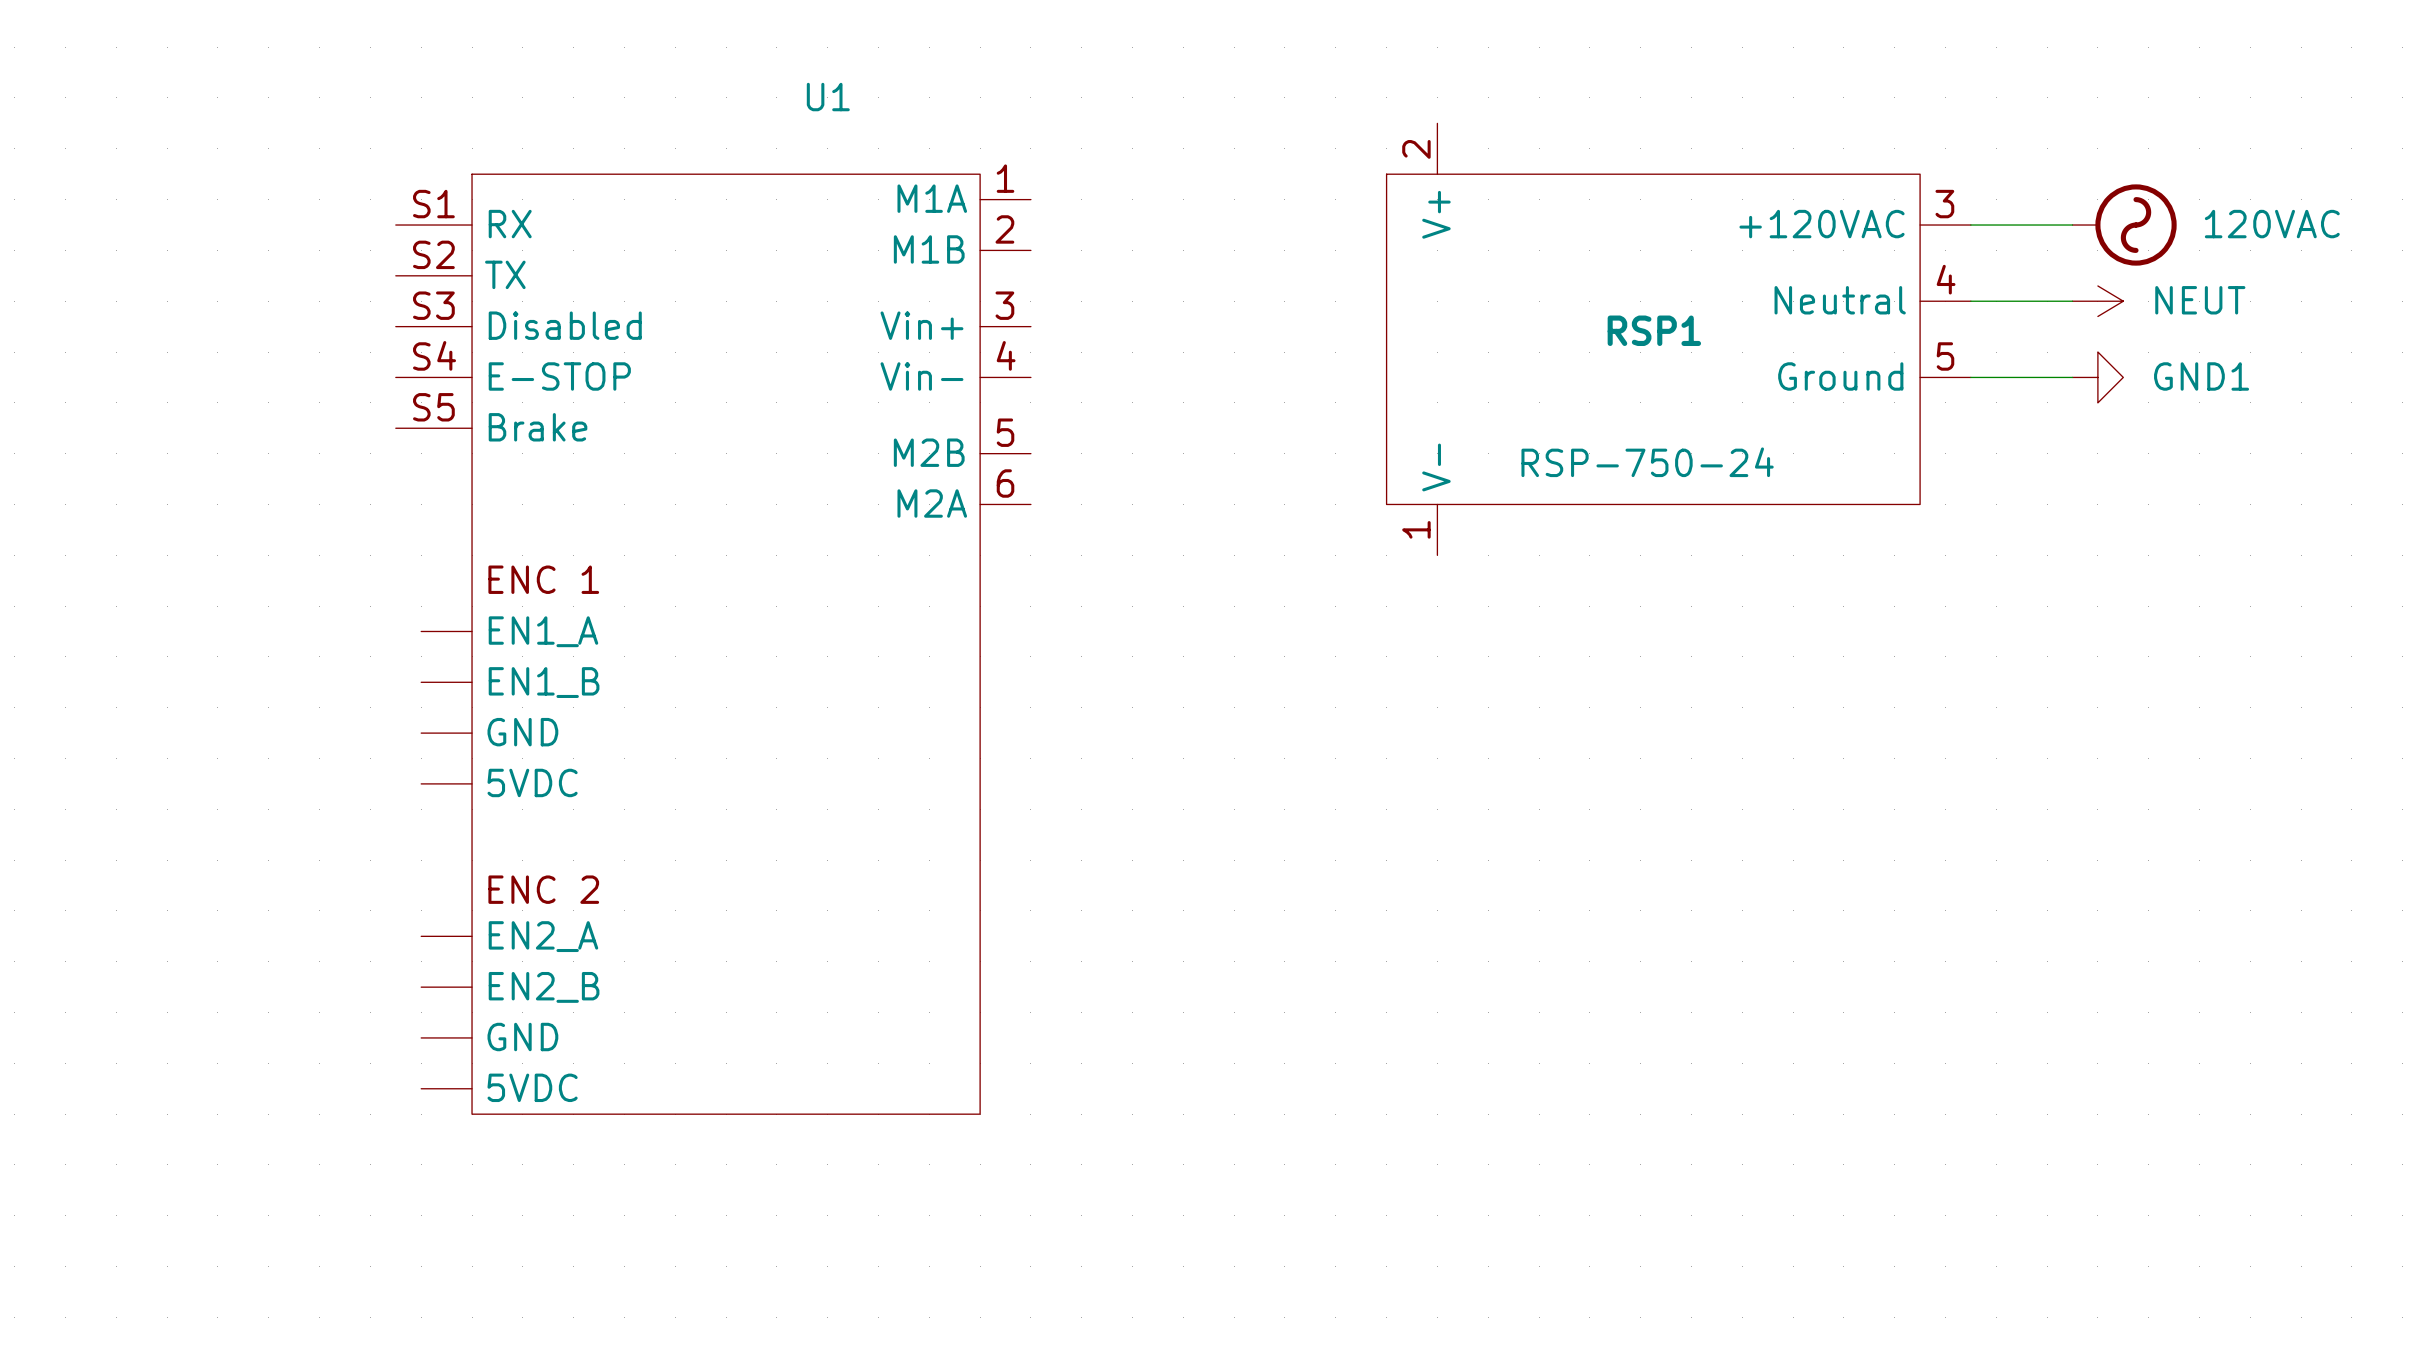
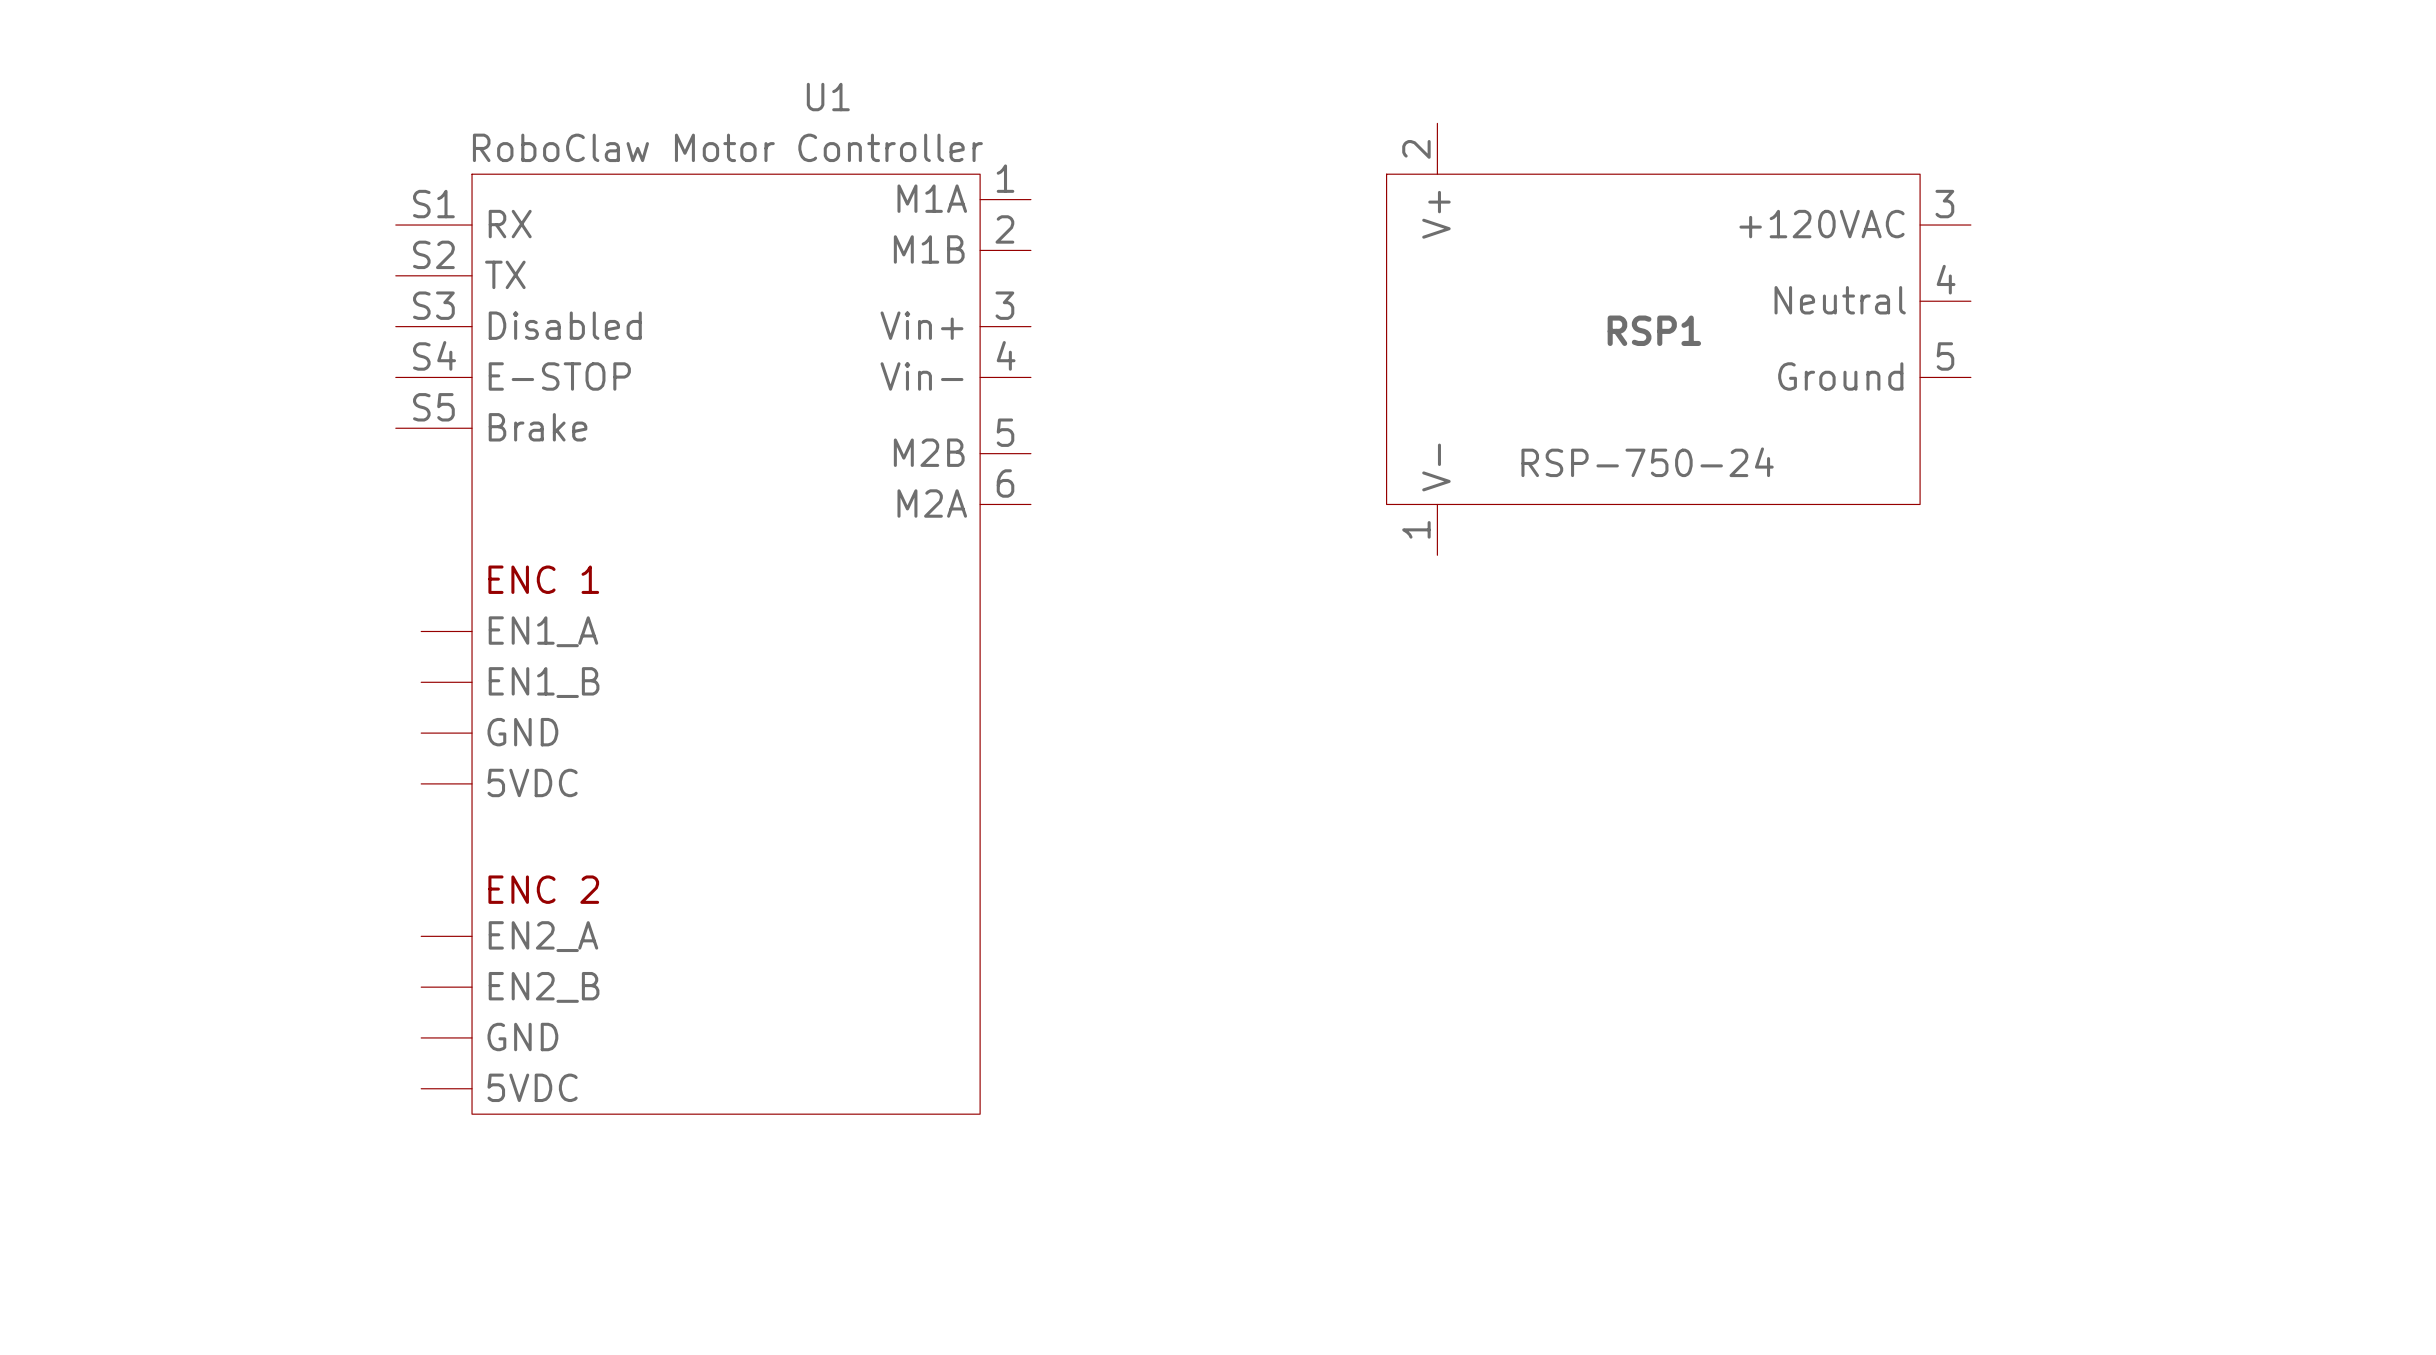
U1 value: none -> RoboClaw Motor Controller (727, 147)
wire: (1970, 225) (2072, 225) -> none
power symbol: 120VAC (2124, 225) -> none
wire: (1970, 301) (2072, 301) -> none
power symbol: NEUT (2097, 301) -> none
wire: (1970, 377) (2072, 377) -> none
power symbol: GND1 (2097, 377) -> none

